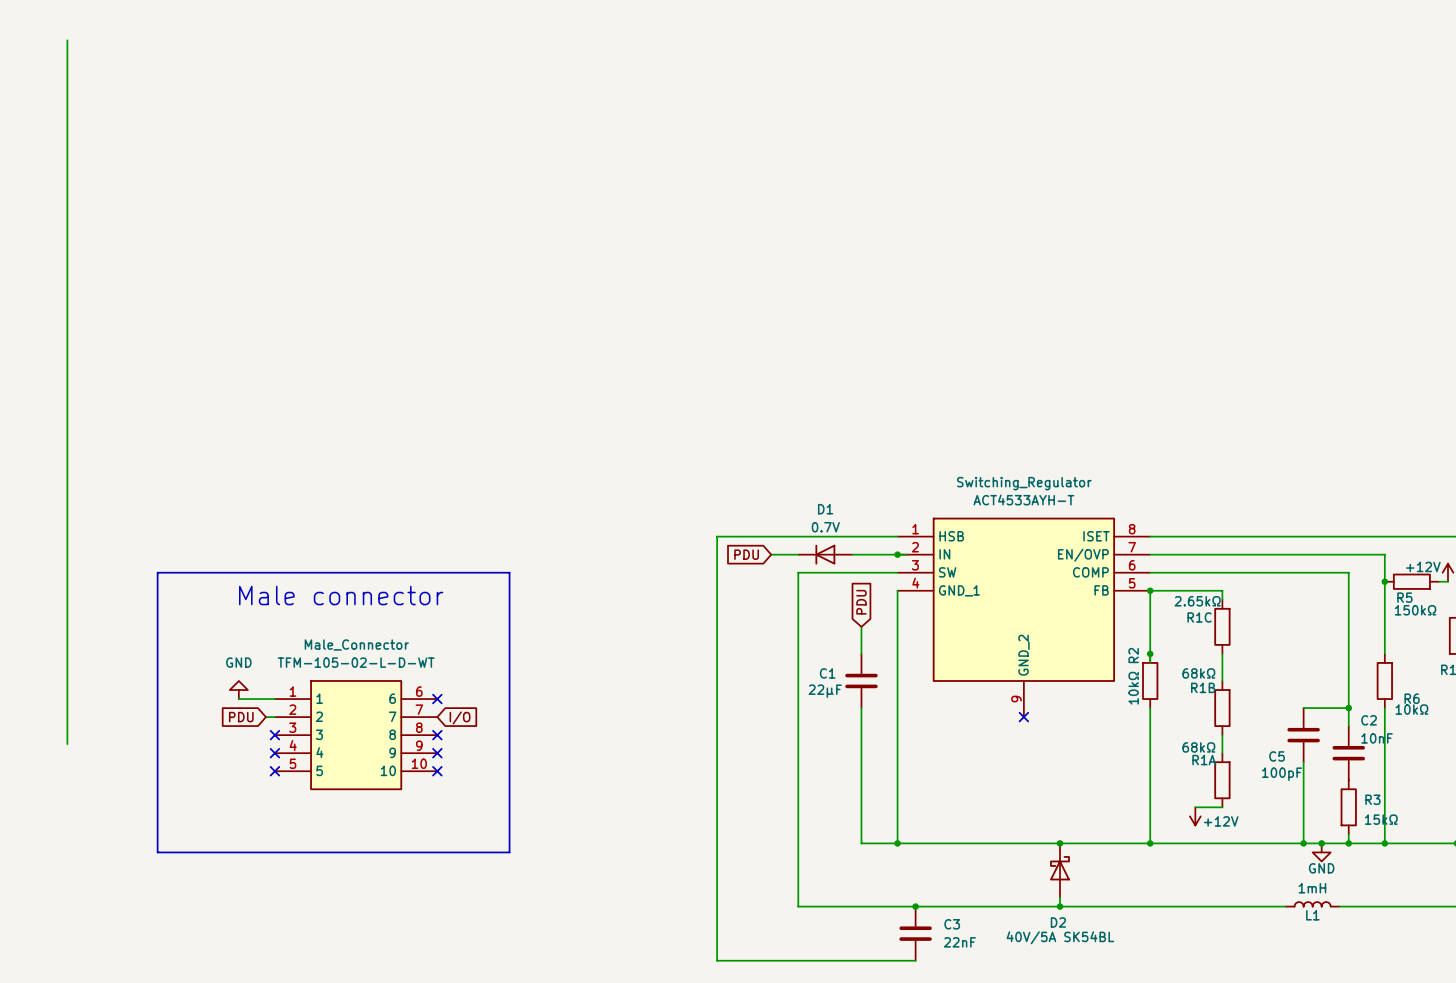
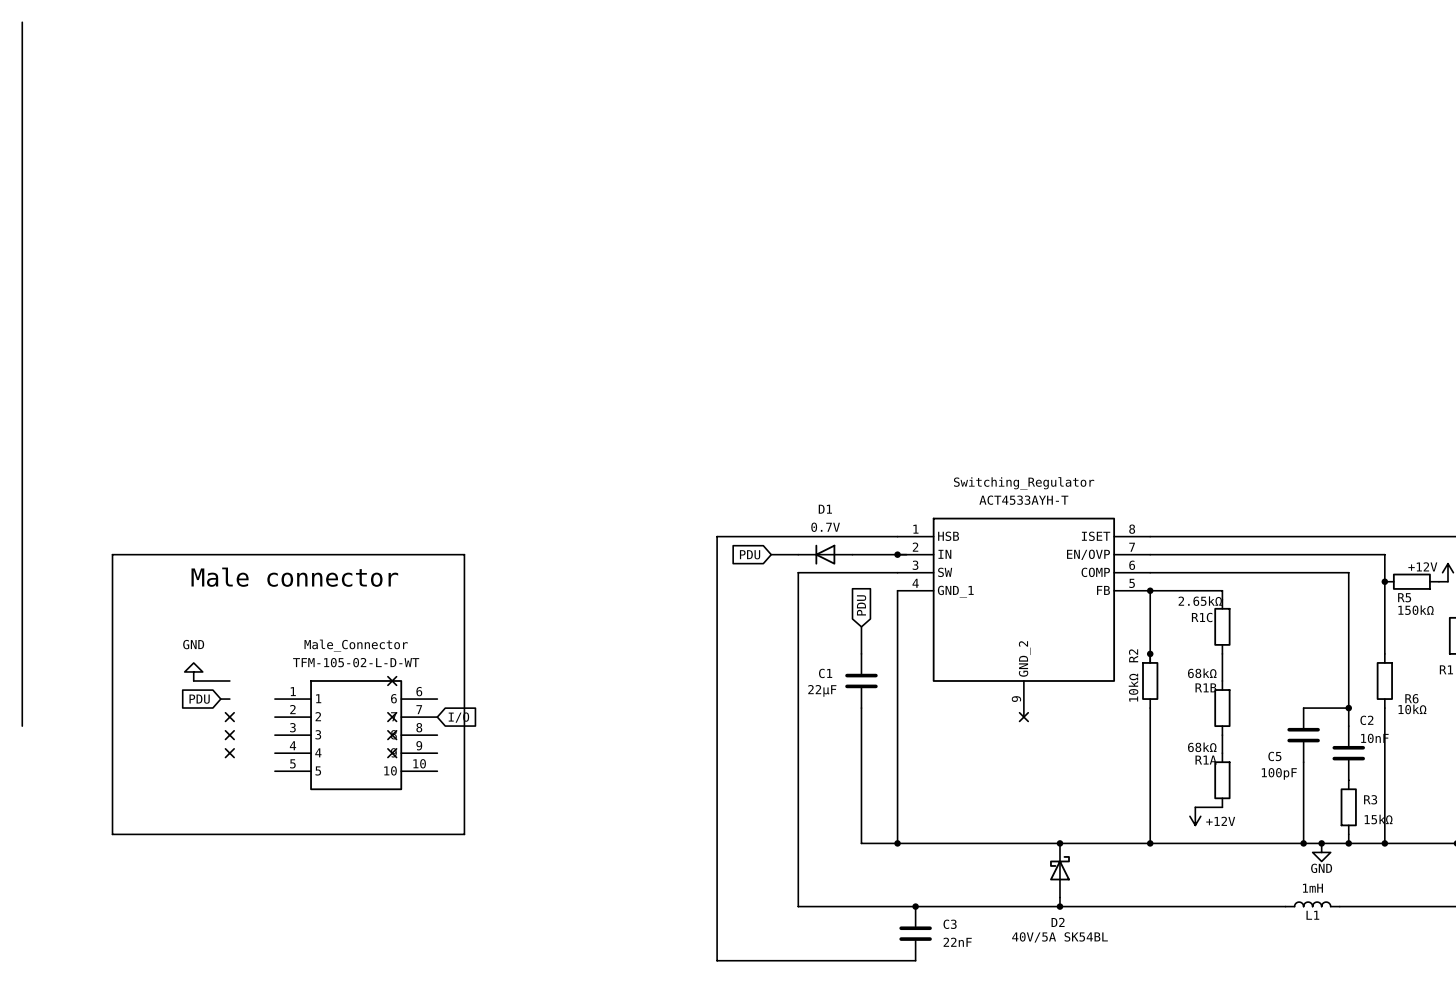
wire: (67, 40) (67, 744) -> (22, 22) (22, 726)
line: (157, 572) (509, 572) (509, 852) (157, 852) (157, 572) -> (112, 554) (464, 554) (464, 834) (112, 834) (112, 554)
text position: Male connector (341, 595) -> Male connector (294, 577)
no-connect mark: none -> (392, 680)
power symbol position: GND (238, 690) -> GND (193, 671)
wire: (238, 699) (274, 699) -> (193, 680) (229, 680)
no-connect mark: (437, 699) -> none
no-connect mark: none -> (229, 717)
global label position: PDU (241, 717) -> PDU (199, 699)
wire: (265, 717) (274, 717) -> (220, 699) (229, 699)
no-connect mark: none -> (392, 717)
no-connect mark: none -> (229, 735)
no-connect mark: (274, 735) -> none
no-connect mark: none -> (392, 735)
no-connect mark: (437, 735) -> none
no-connect mark: none -> (229, 753)
no-connect mark: (274, 753) -> none
no-connect mark: none -> (392, 753)
no-connect mark: (437, 753) -> none
no-connect mark: (274, 771) -> none
no-connect mark: (437, 771) -> none

